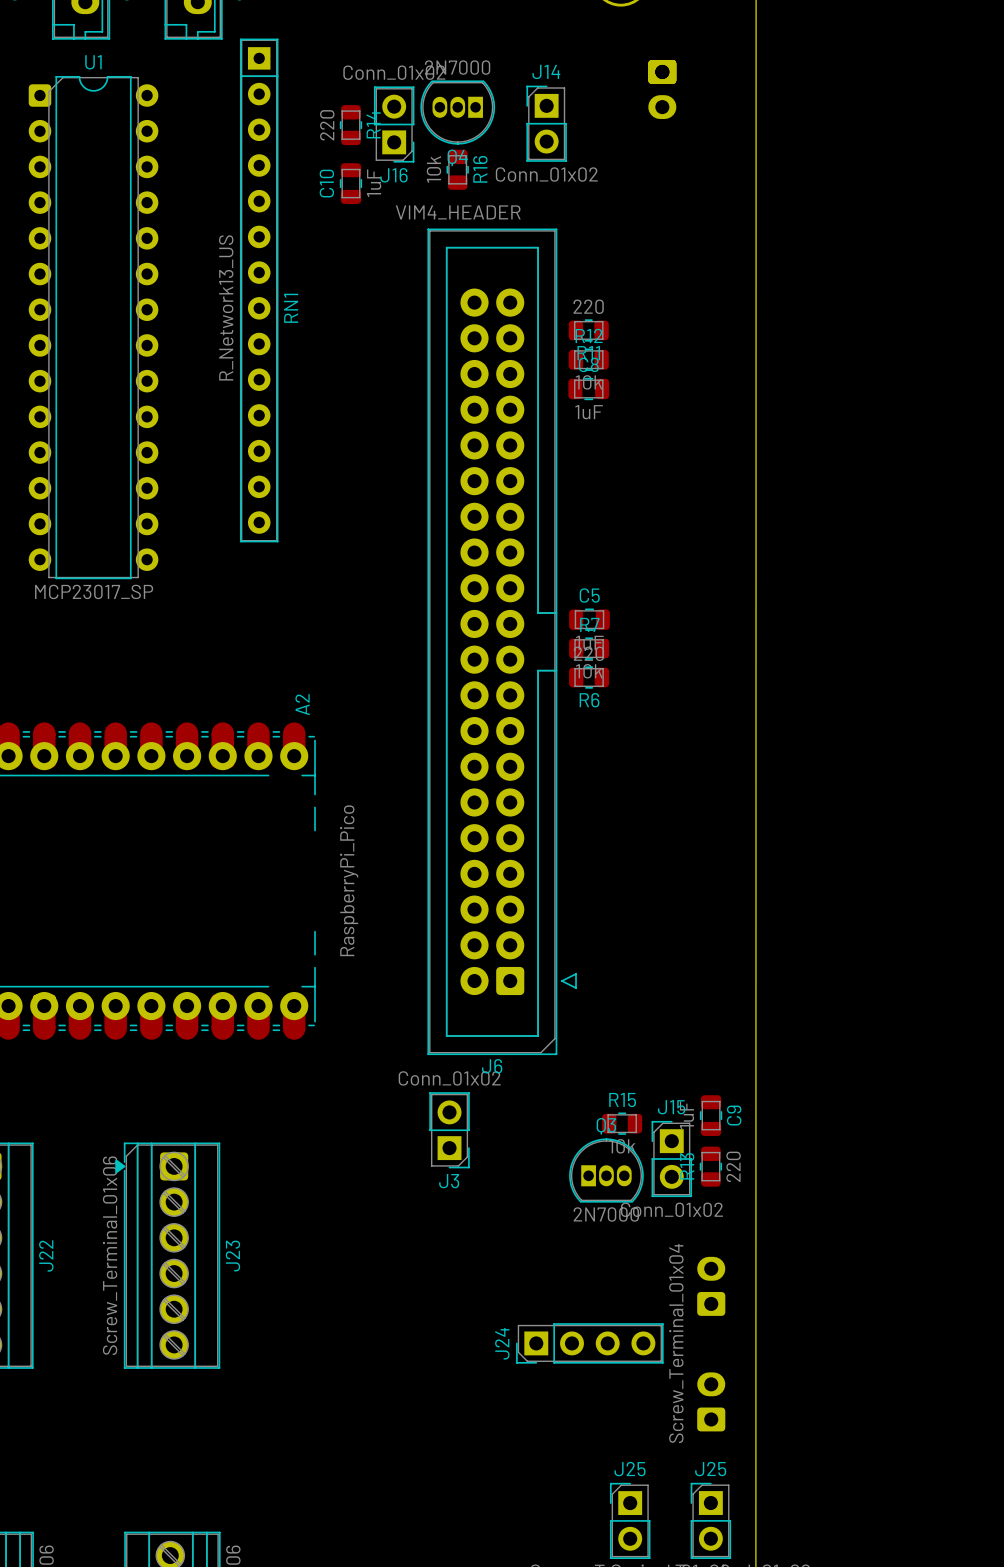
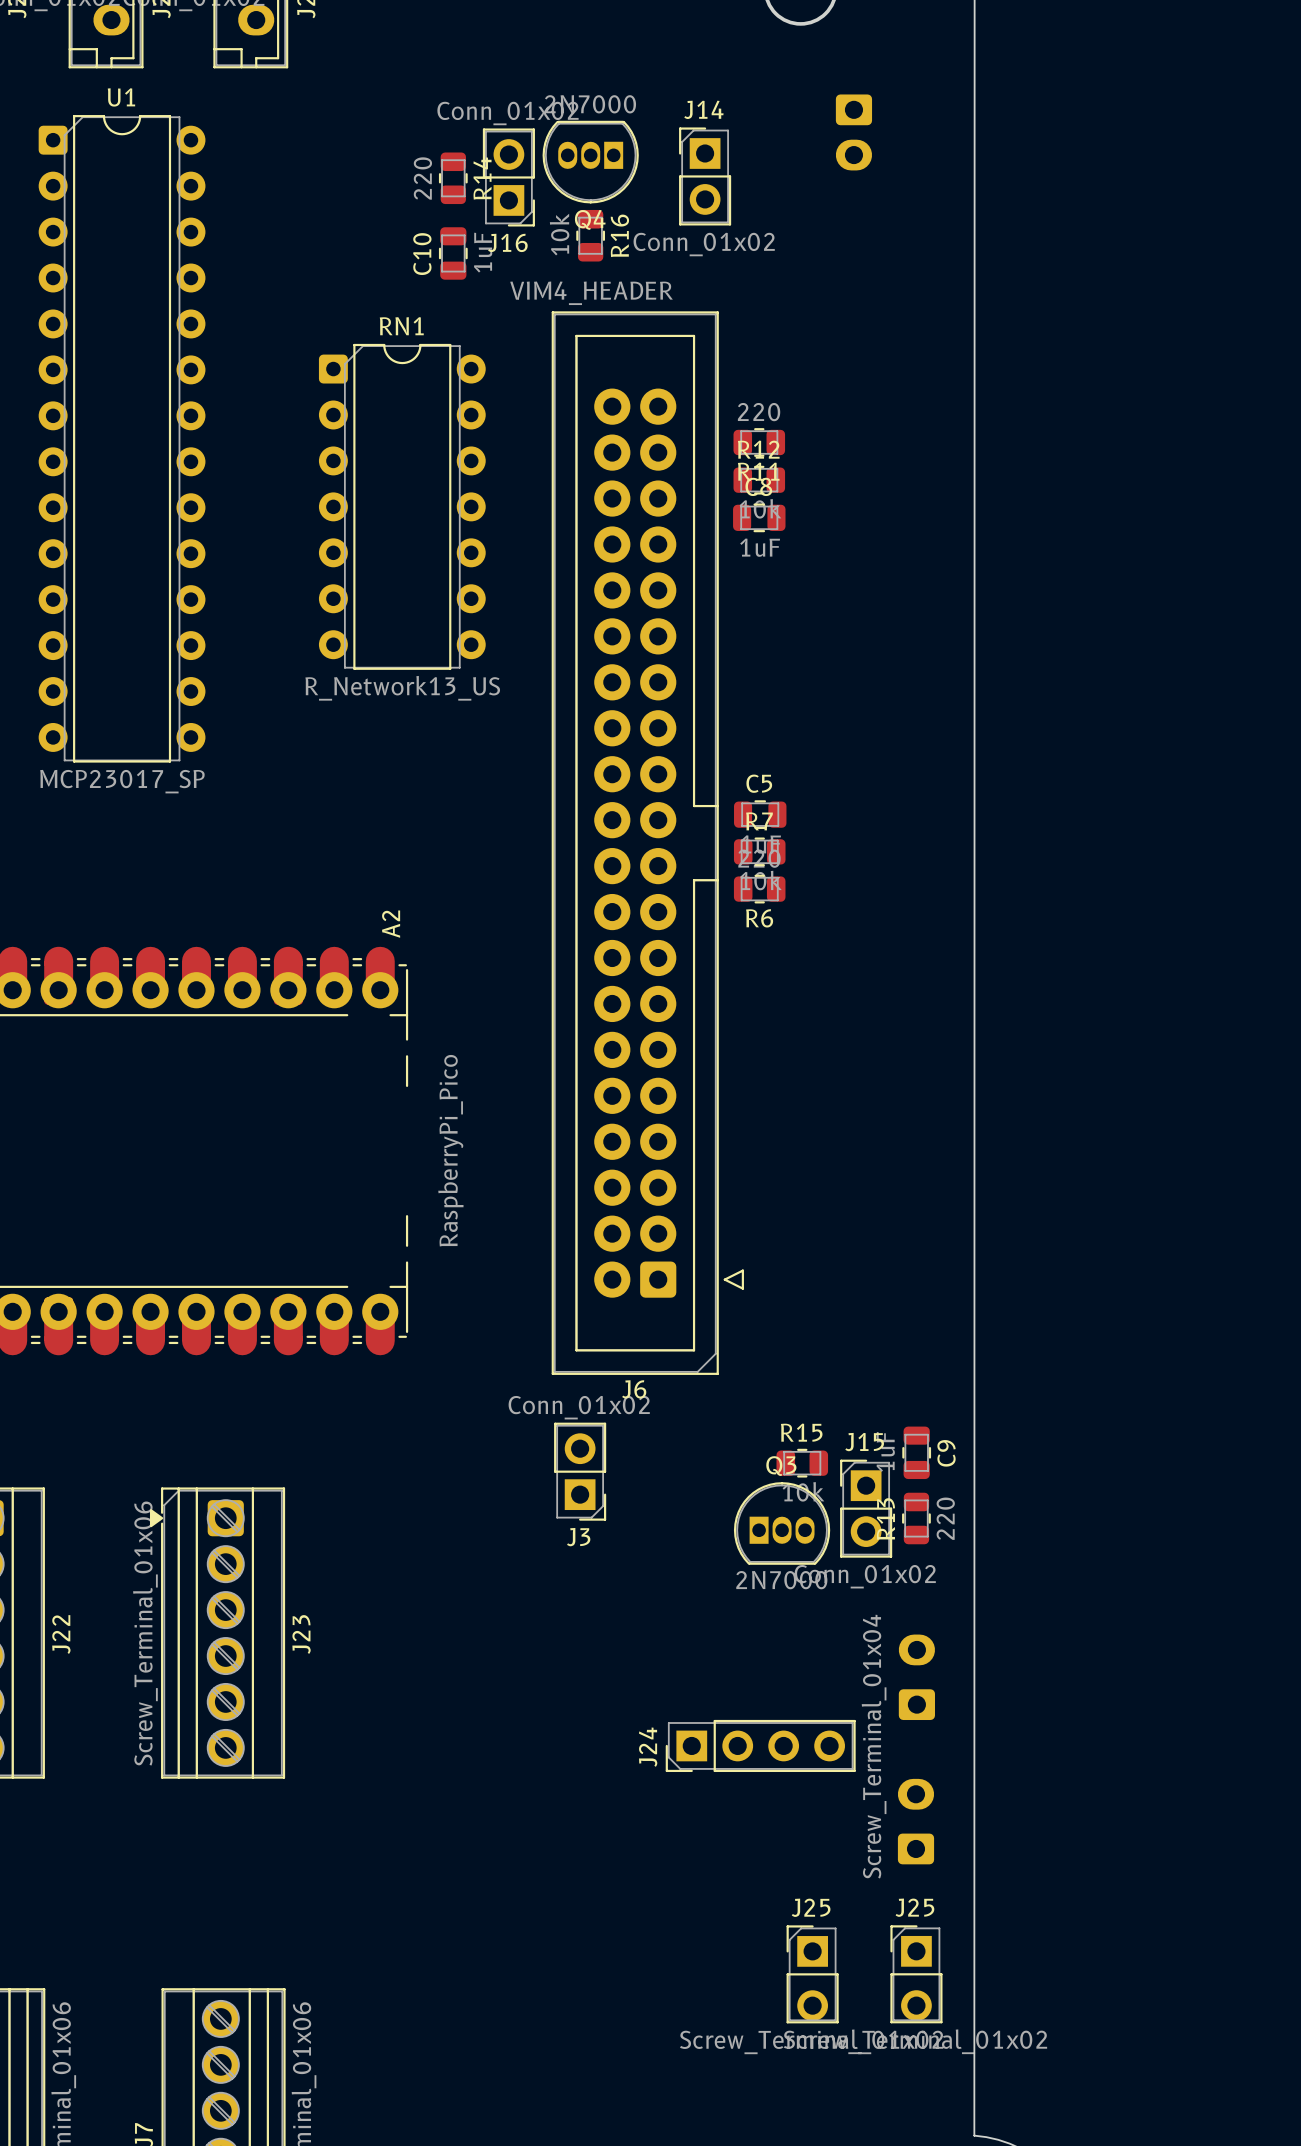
RN1 footprint: [239, 38, 279, 543] -> [318, 343, 486, 670]
part: (662, 71) -> none
RN1 value position: R_Network13_US (226, 307) -> R_Network13_US (402, 688)
RN1 name position: RN1 (291, 308) -> RN1 (401, 326)
part footprint: [697, 1256, 726, 1316] -> [898, 1634, 936, 1721]
part: (711, 1384) -> none
part: none -> (916, 1821)
part: (711, 1419) -> none
J25 footprint: [609, 1482, 651, 1560] -> [786, 1925, 839, 2024]
J25 footprint: [690, 1482, 732, 1559] -> [890, 1925, 943, 2024]

